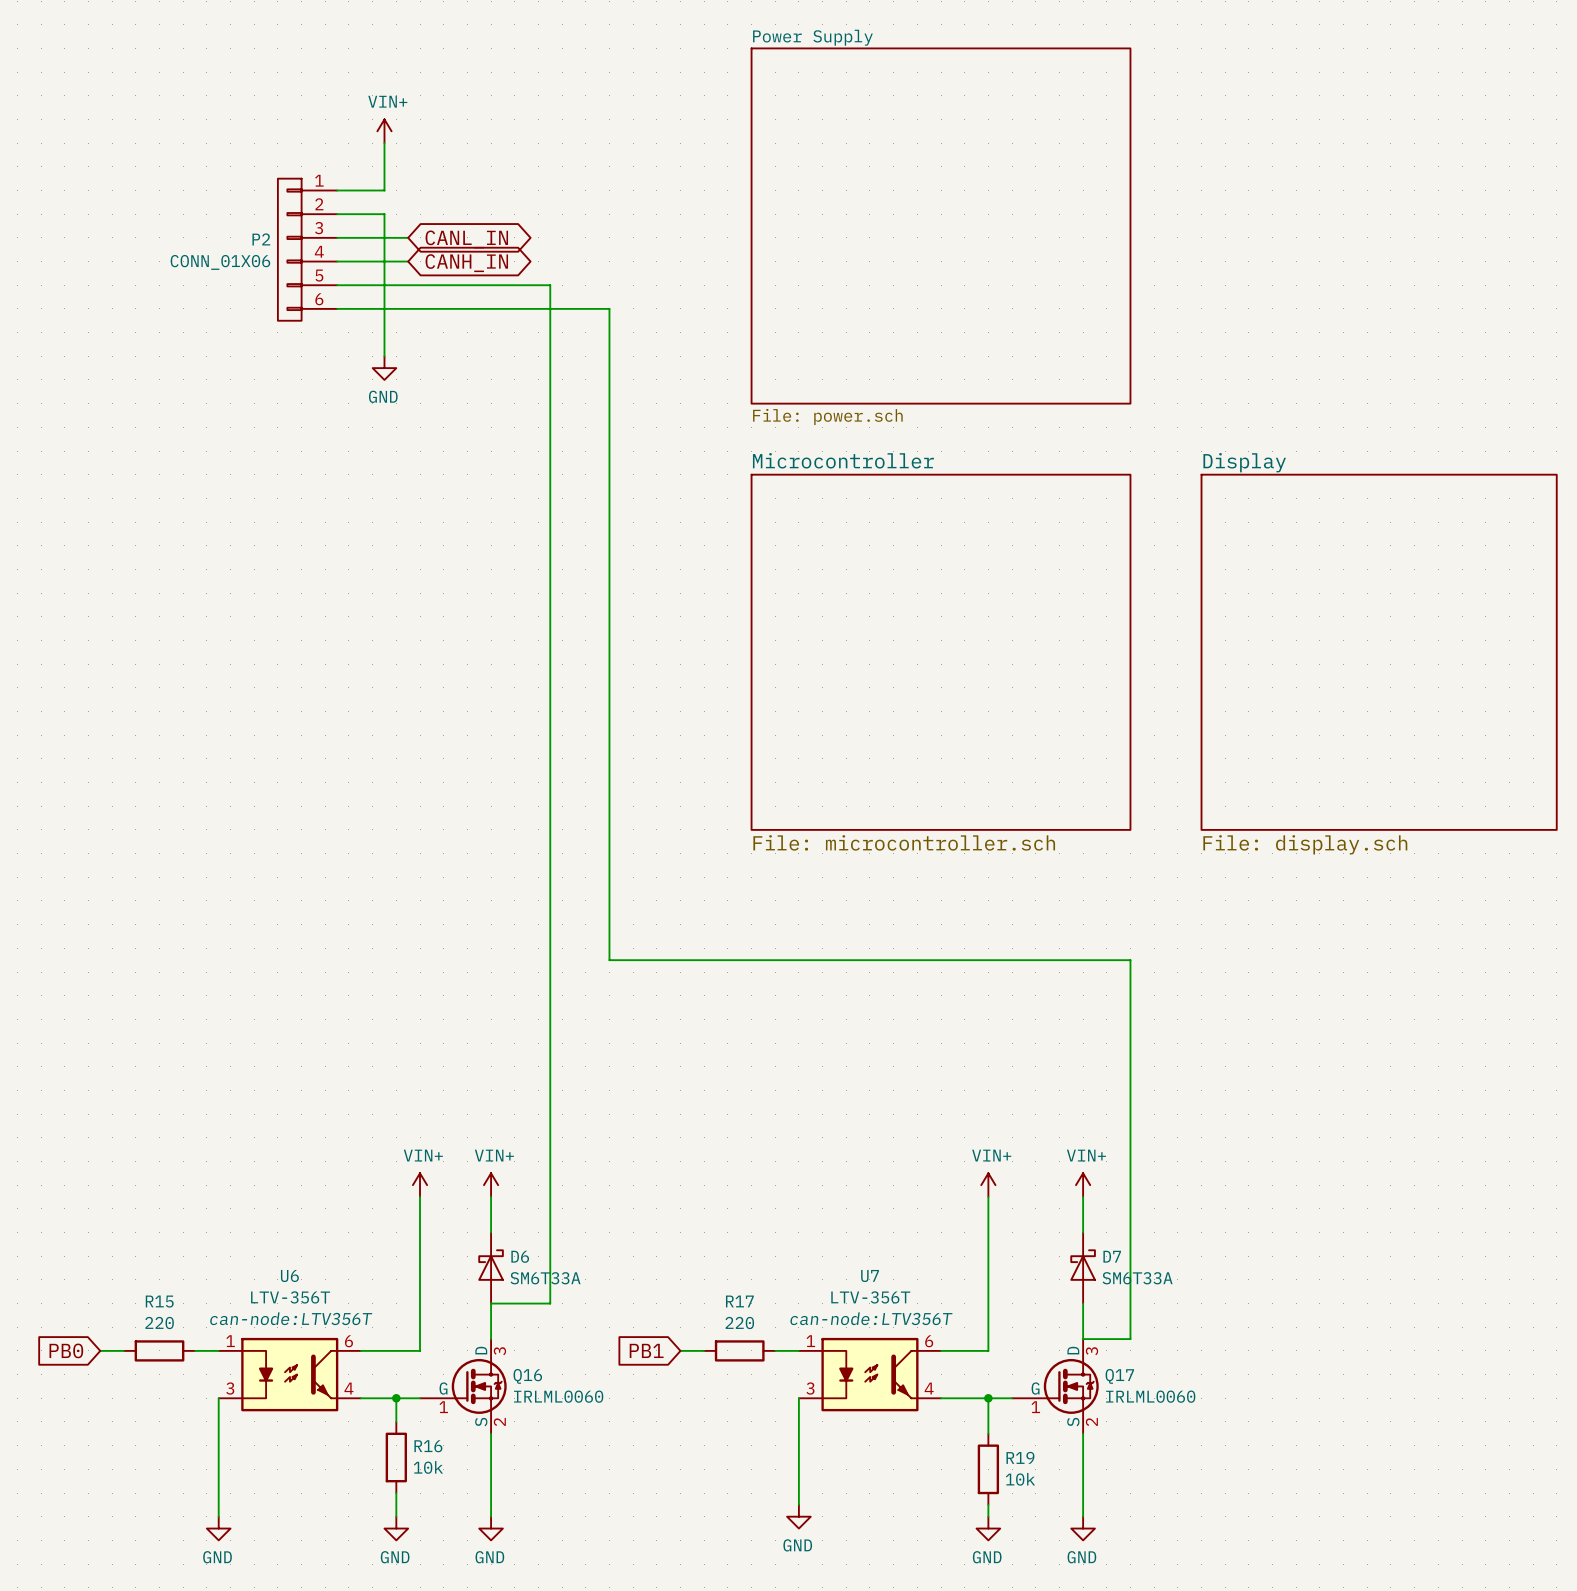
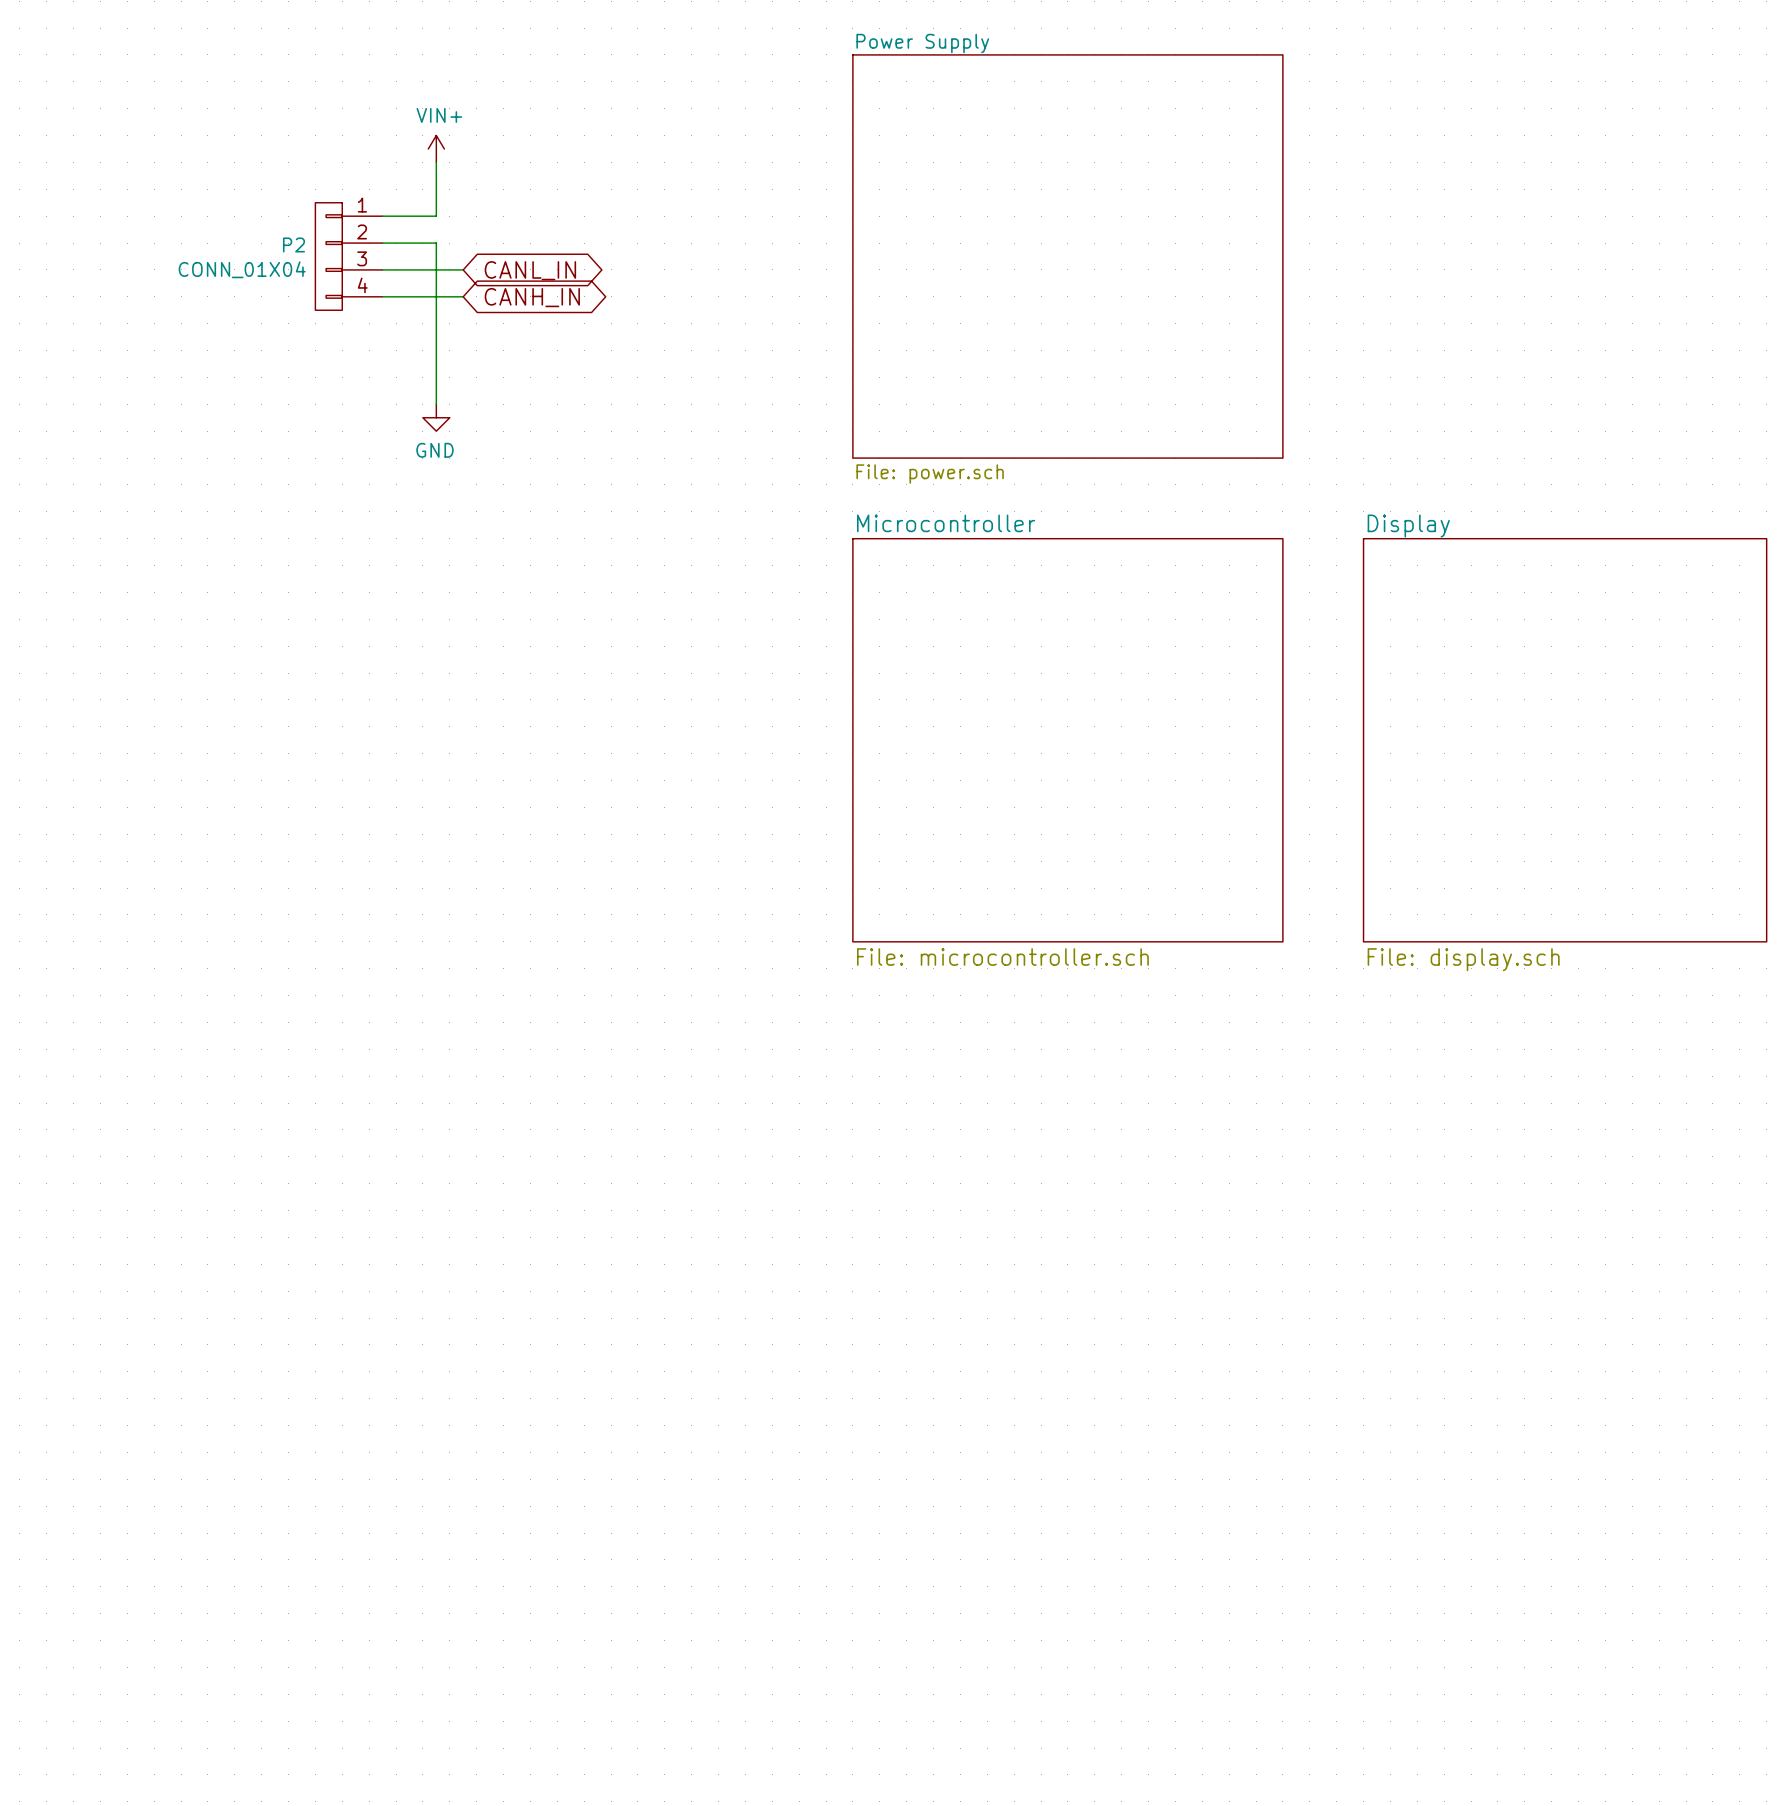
P2 symbol: [277, 178, 338, 321] -> [315, 202, 383, 311]
P2 value: CONN_01X06 (220, 262) -> CONN_01X04 (242, 269)
wire: (337, 285) (550, 285) (550, 1303) (491, 1303) (491, 1339) -> none
wire: (337, 308) (609, 308) (609, 960) (1130, 960) (1130, 1339) (1083, 1339) (1083, 1303) -> none
power symbol: VIN+ (420, 1185) -> none
power symbol: VIN+ (491, 1185) -> none
power symbol: VIN+ (988, 1185) -> none
power symbol: VIN+ (1083, 1185) -> none
wire: (420, 1196) (420, 1350) (360, 1350) -> none
wire: (491, 1196) (491, 1232) -> none
wire: (988, 1196) (988, 1350) (941, 1350) -> none
wire: (1083, 1196) (1083, 1232) -> none
D6: SM6T33A (491, 1268) -> none
D7: SM6T33A (1083, 1268) -> none
global label: PB0 (66, 1350) -> none
wire: (100, 1350) (123, 1350) -> none
R15: 220 (159, 1350) -> none
wire: (195, 1350) (218, 1350) -> none
global label: PB1 (646, 1350) -> none
wire: (680, 1350) (704, 1350) -> none
R17: 220 (739, 1350) -> none
wire: (775, 1350) (798, 1350) -> none
U6: LTV-356T (289, 1374) -> none
U7: LTV-356T (869, 1374) -> none
Q16: IRLML0060 (463, 1386) -> none
Q17: IRLML0060 (1055, 1386) -> none
wire: (218, 1398) (218, 1516) -> none
wire: (360, 1398) (420, 1398) -> none
wire: (396, 1398) (396, 1421) -> none
junction: (396, 1398) -> none
wire: (798, 1398) (798, 1504) -> none
wire: (941, 1398) (1012, 1398) -> none
wire: (988, 1398) (988, 1433) -> none
junction: (988, 1398) -> none
wire: (491, 1433) (491, 1516) -> none
wire: (1083, 1433) (1083, 1516) -> none
R16: 10k (396, 1457) -> none
R19: 10k (988, 1469) -> none
wire: (396, 1493) (396, 1516) -> none
wire: (988, 1504) (988, 1516) -> none
power symbol: GND (798, 1516) -> none
power symbol: GND (218, 1528) -> none
power symbol: GND (396, 1528) -> none
power symbol: GND (491, 1528) -> none
power symbol: GND (988, 1528) -> none
power symbol: GND (1083, 1528) -> none

